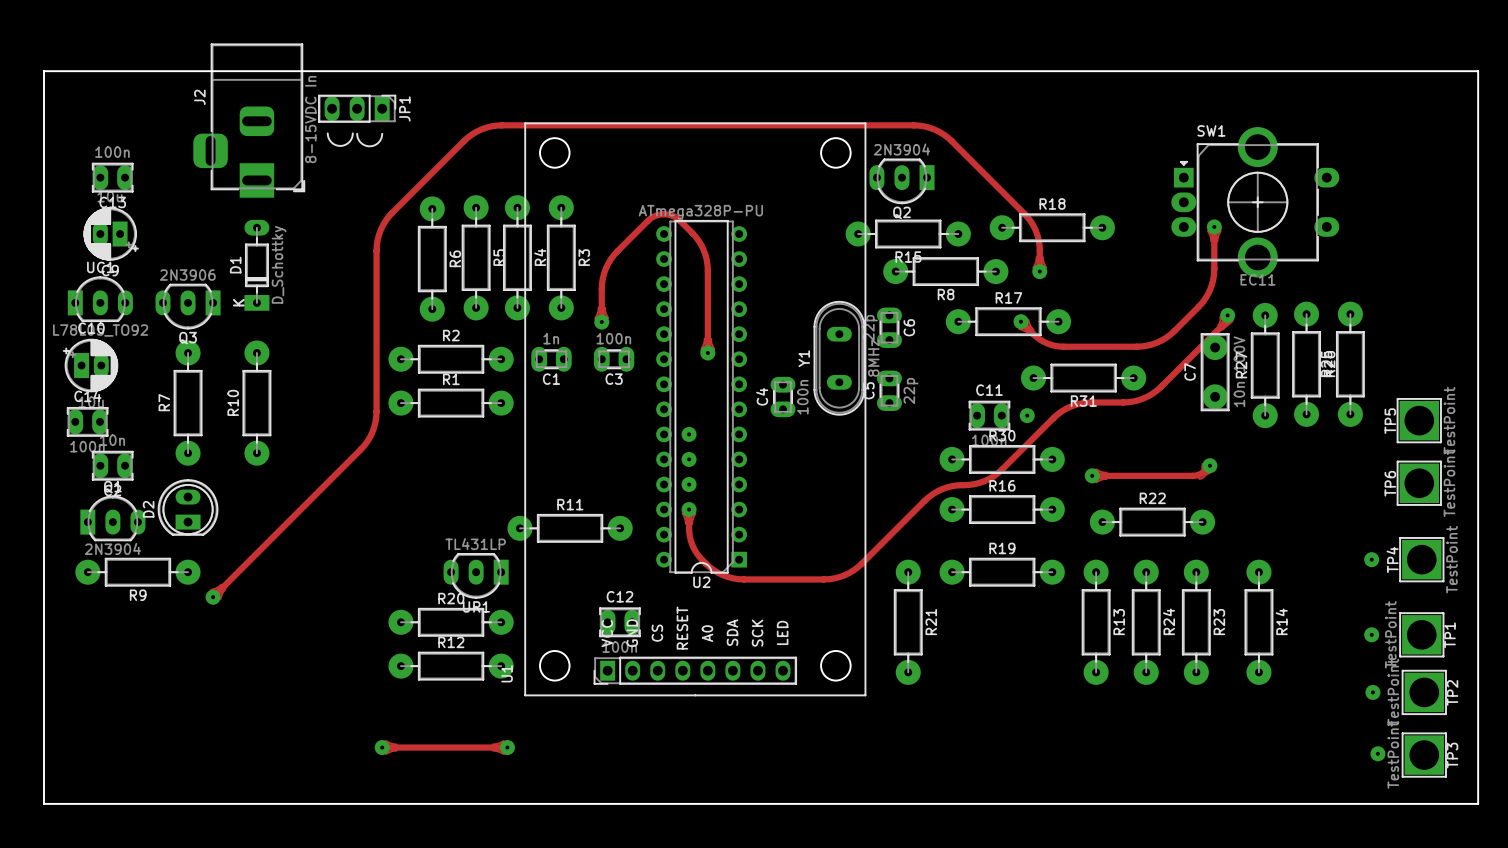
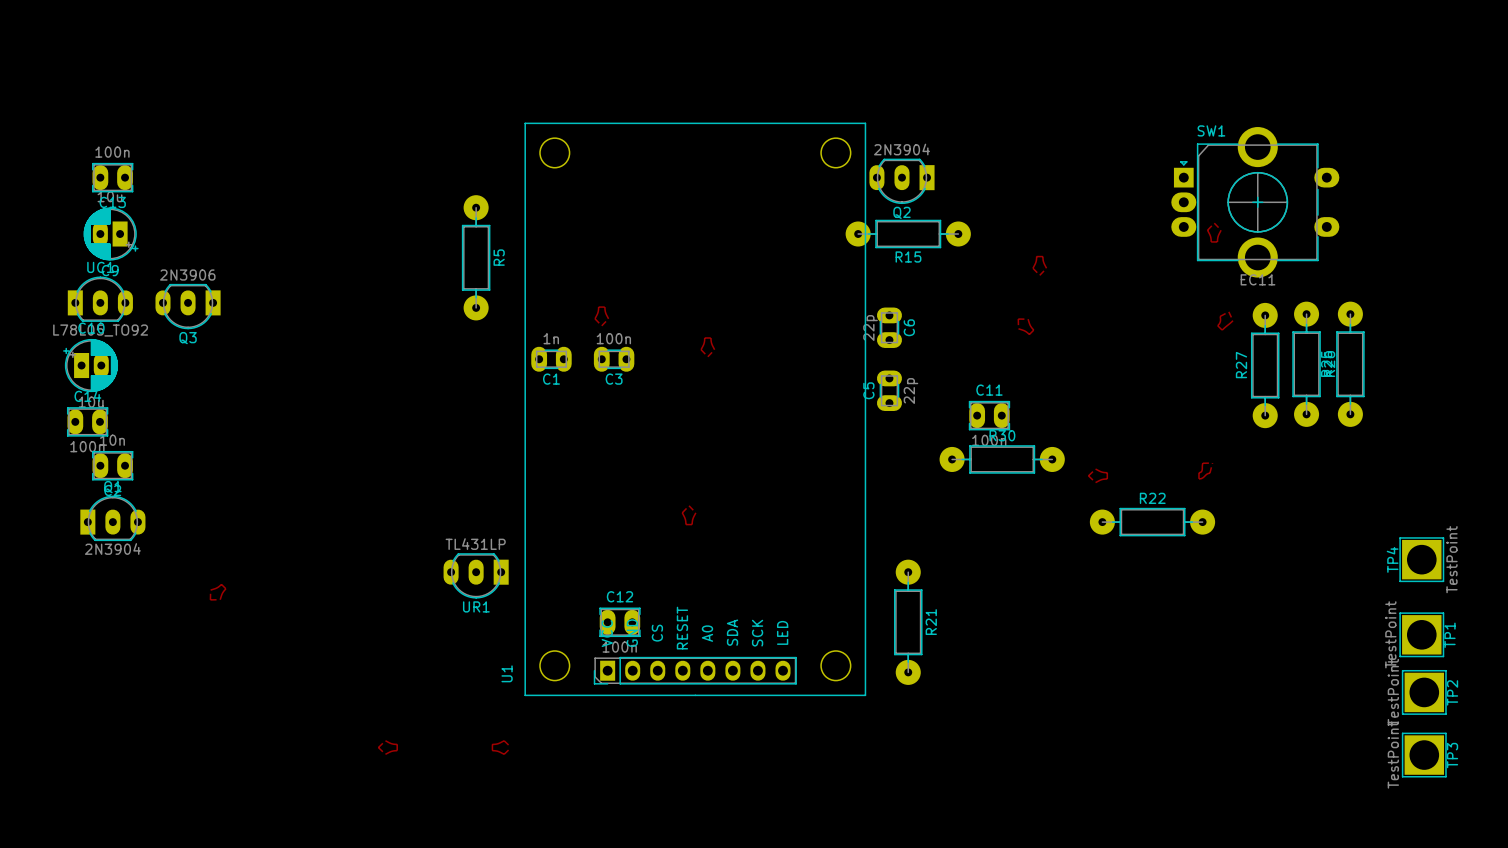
board edge: (44, 71) (44, 803) (1478, 803) (1478, 71) (44, 71) -> none
J2: 8-15VDC In (249, 120) -> none
JP1: (357, 121) -> none
track: (1214, 226) (1214, 274) (1210, 289) (1198, 306) (1174, 331) (1161, 340) (1141, 346) (1059, 346) (1039, 339) (1020, 321) -> none
via: (1214, 226) -> none
R18: (1052, 227) -> none
R4: (517, 257) -> none
R3: (561, 257) -> none
R6: (432, 259) -> none
D1: D_Schottky (256, 265) -> none
R8: (945, 271) -> none
track: (1039, 271) (1038, 240) (1028, 217) (951, 141) (943, 134) (929, 127) (913, 125) (501, 125) (481, 129) (464, 141) (392, 212) (380, 230) (376, 250) (376, 416) (370, 436) (360, 449) (213, 597) -> none
via: (1039, 271) -> none
track: (1227, 315) (1225, 321) (1153, 393) (1133, 401) (1086, 402) (1066, 408) (1053, 418) (994, 476) (974, 484) (947, 487) (928, 497) (861, 563) (844, 575) (823, 579) (743, 579) (723, 575) (709, 567) (694, 549) (689, 532) (689, 509) -> none
via: (1227, 315) -> none
R17: (1008, 321) -> none
via: (1020, 321) -> none
track: (601, 322) (602, 283) (604, 273) (610, 259) (651, 218) (659, 214) (670, 215) (678, 219) (695, 236) (705, 255) (707, 270) (707, 353) -> none
via: (601, 322) -> none
via: (707, 353) -> none
Y1: 8MHz (839, 358) -> none
R2: (451, 359) -> none
C7: 10n 100V (1215, 372) -> none
R31: (1083, 378) -> none
U2: ATmega328P-PU (701, 396) -> none
C4: 100n (783, 397) -> none
R7: (188, 403) -> none
R10: (256, 403) -> none
R1: (451, 403) -> none
via: (1027, 415) -> none
TP5: TestPoint (1419, 420) -> none
via: (689, 434) -> none
via: (689, 459) -> none
track: (1209, 465) (1201, 473) (1194, 475) (1092, 475) -> none
via: (1209, 465) -> none
via: (1092, 475) -> none
TP6: TestPoint (1419, 483) -> none
via: (689, 484) -> none
D2: (188, 507) -> none
via: (689, 509) -> none
R16: (1002, 509) -> none
R11: (570, 528) -> none
via: (1371, 559) -> none
R9: (137, 572) -> none
R19: (1002, 572) -> none
via: (213, 597) -> none
R20: (451, 622) -> none
R13: (1096, 622) -> none
R24: (1146, 622) -> none
R23: (1196, 622) -> none
R14: (1258, 622) -> none
via: (1371, 634) -> none
R12: (451, 666) -> none
via: (1372, 692) -> none
track: (382, 747) (507, 747) -> none
via: (382, 747) -> none
via: (507, 747) -> none
via: (1377, 753) -> none

